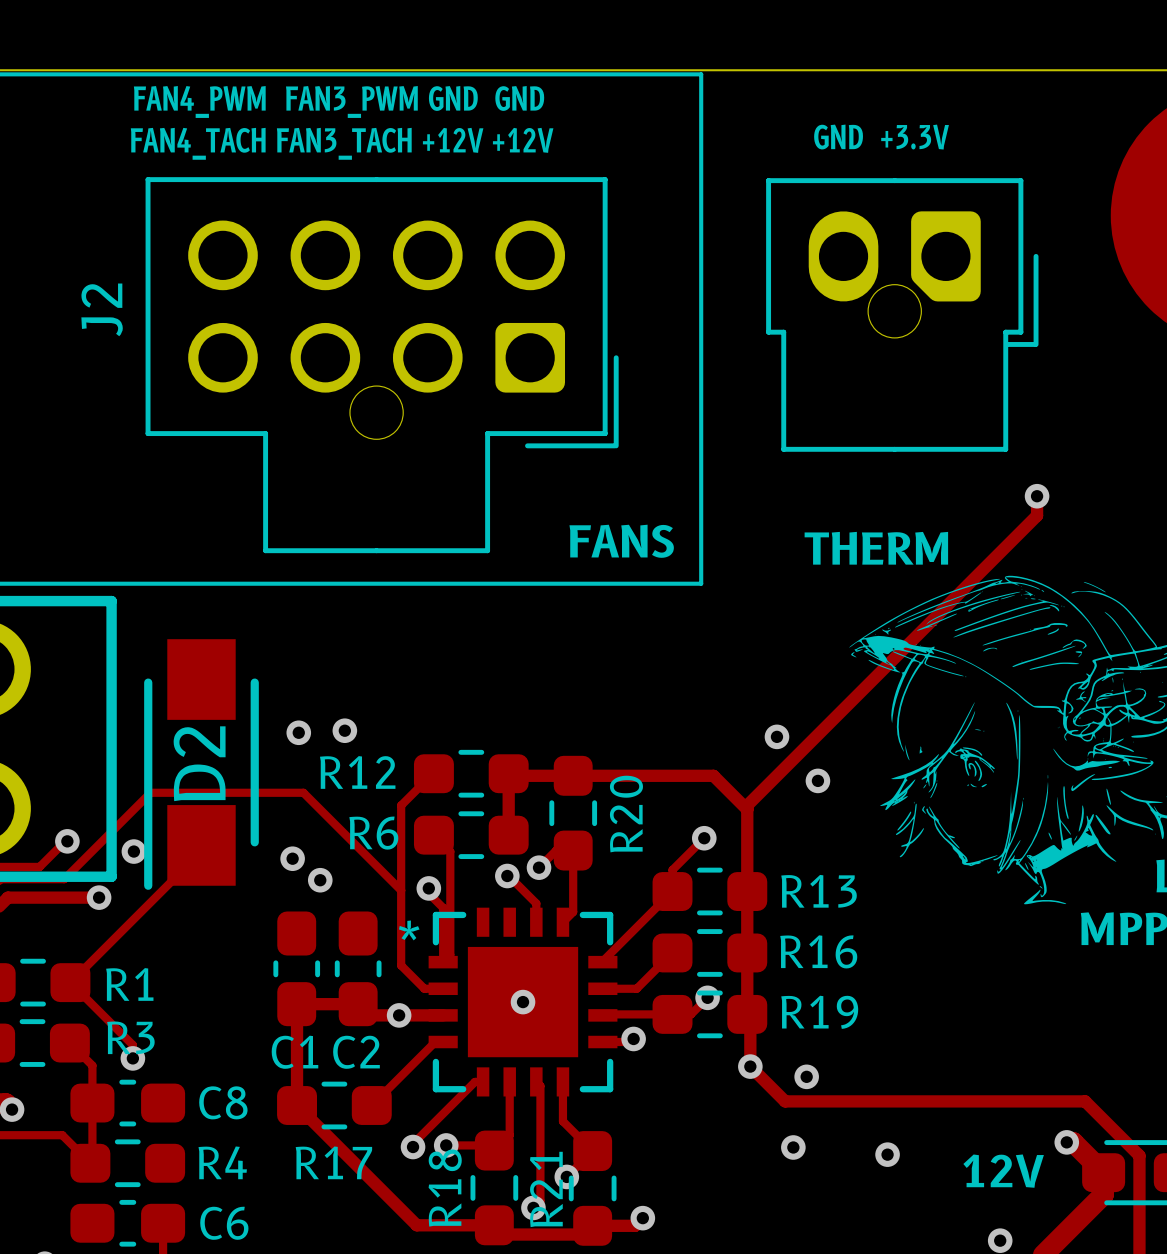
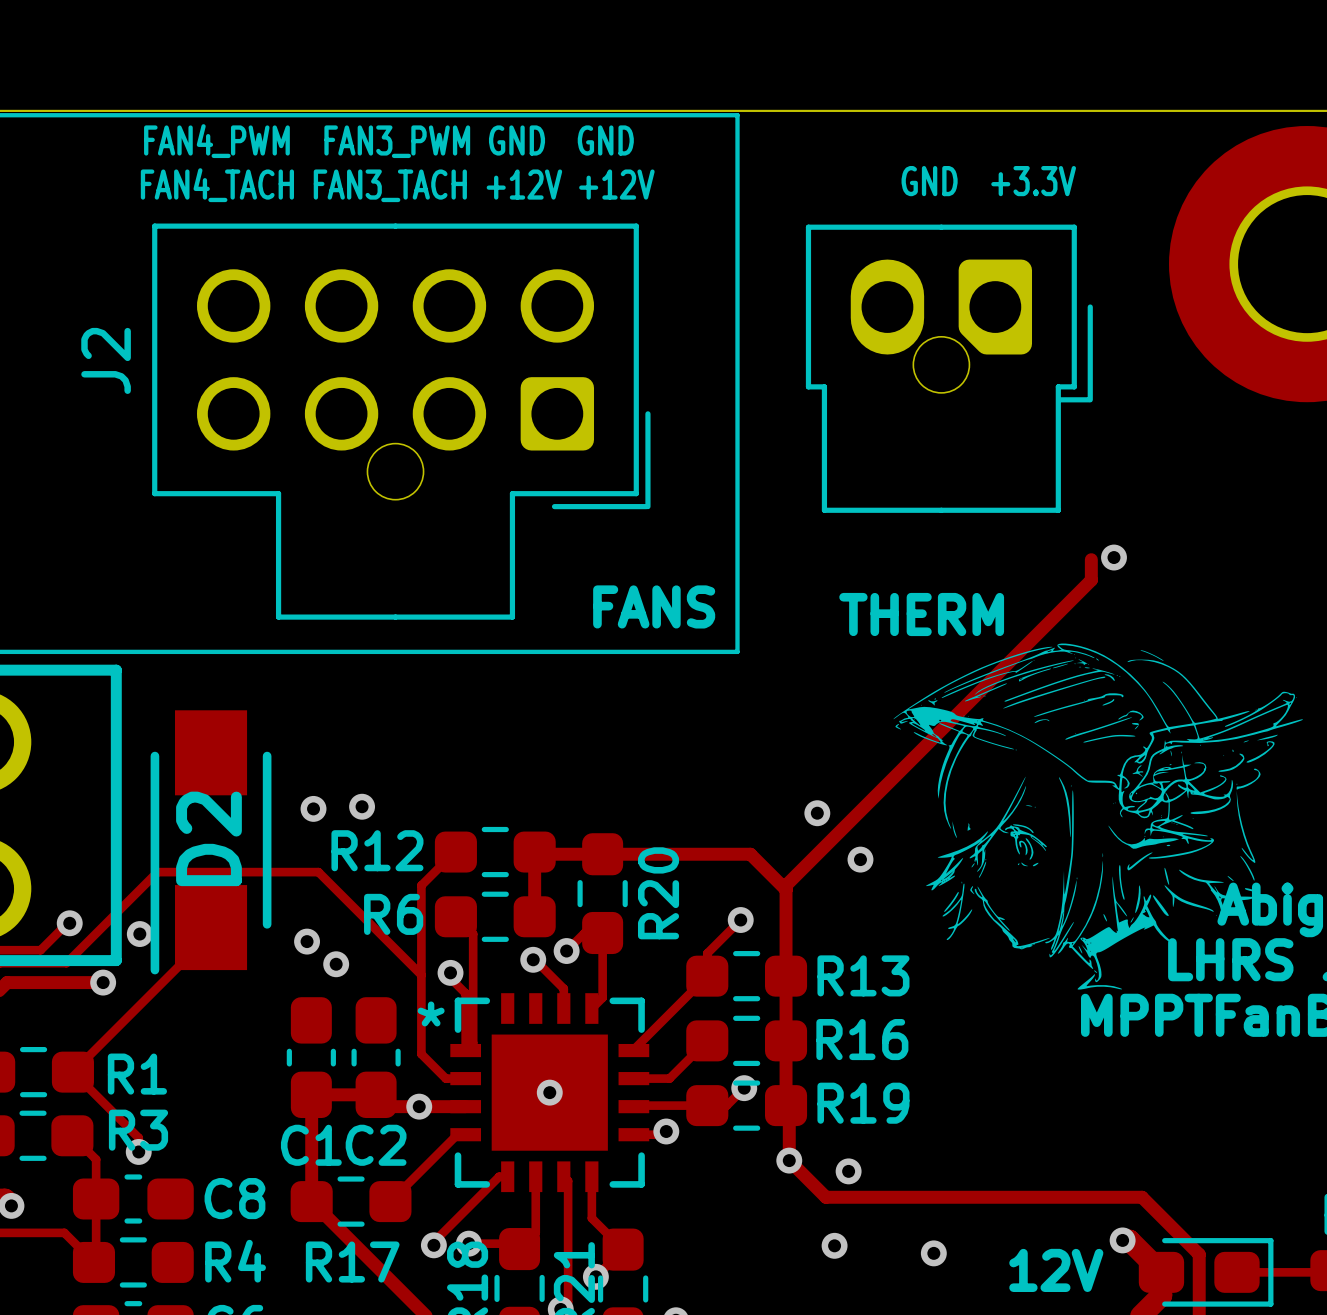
text position: GND +3.3V (881, 137) -> GND +3.3V (988, 181)
via position: (1037, 496) -> (1114, 557)

